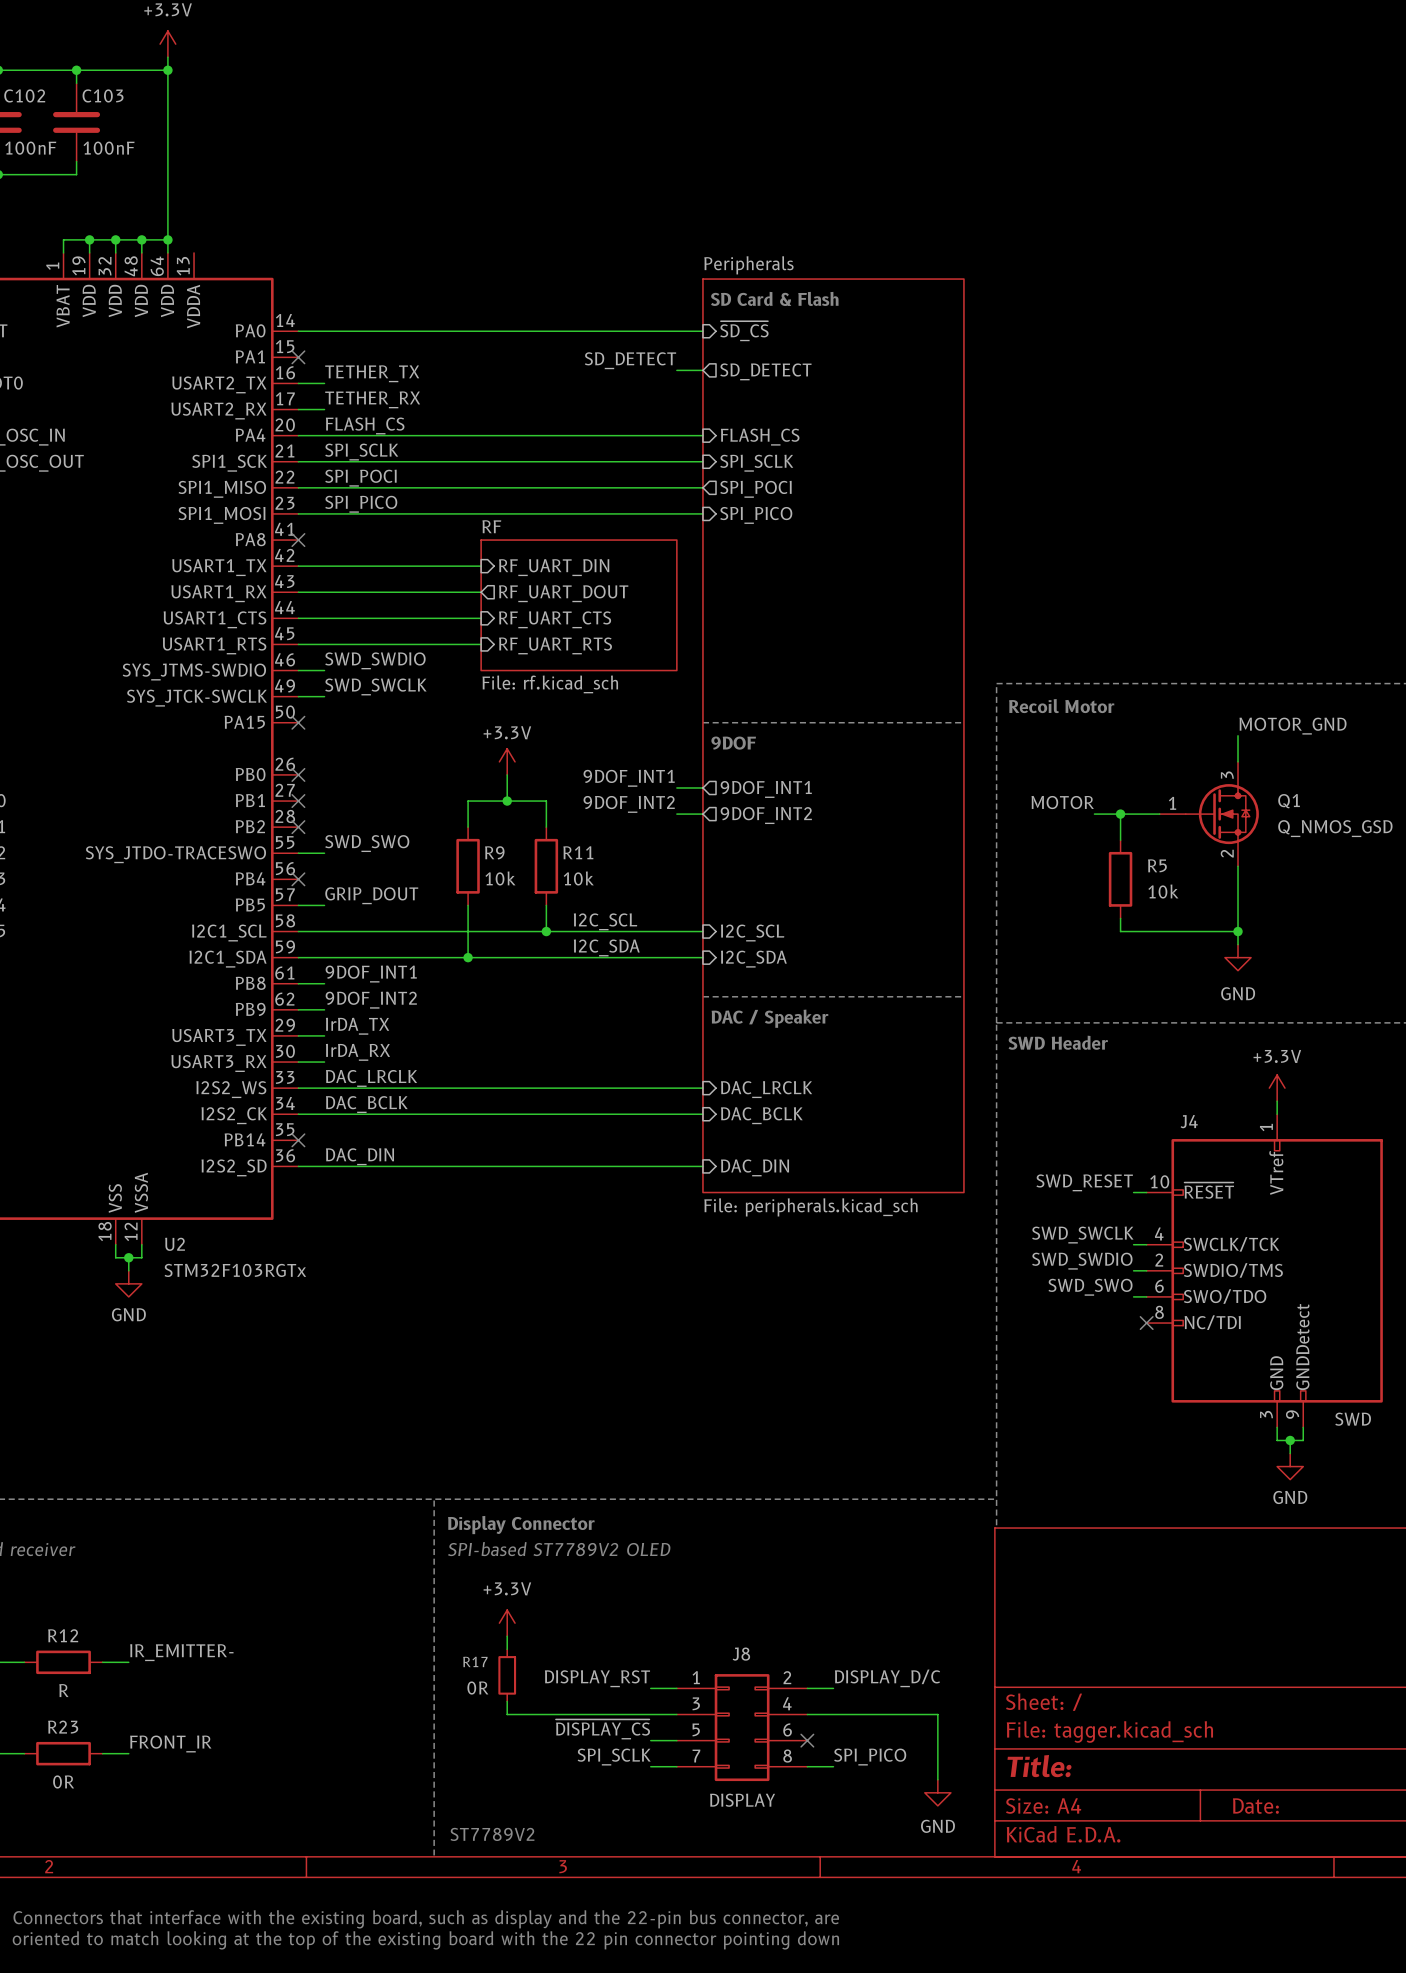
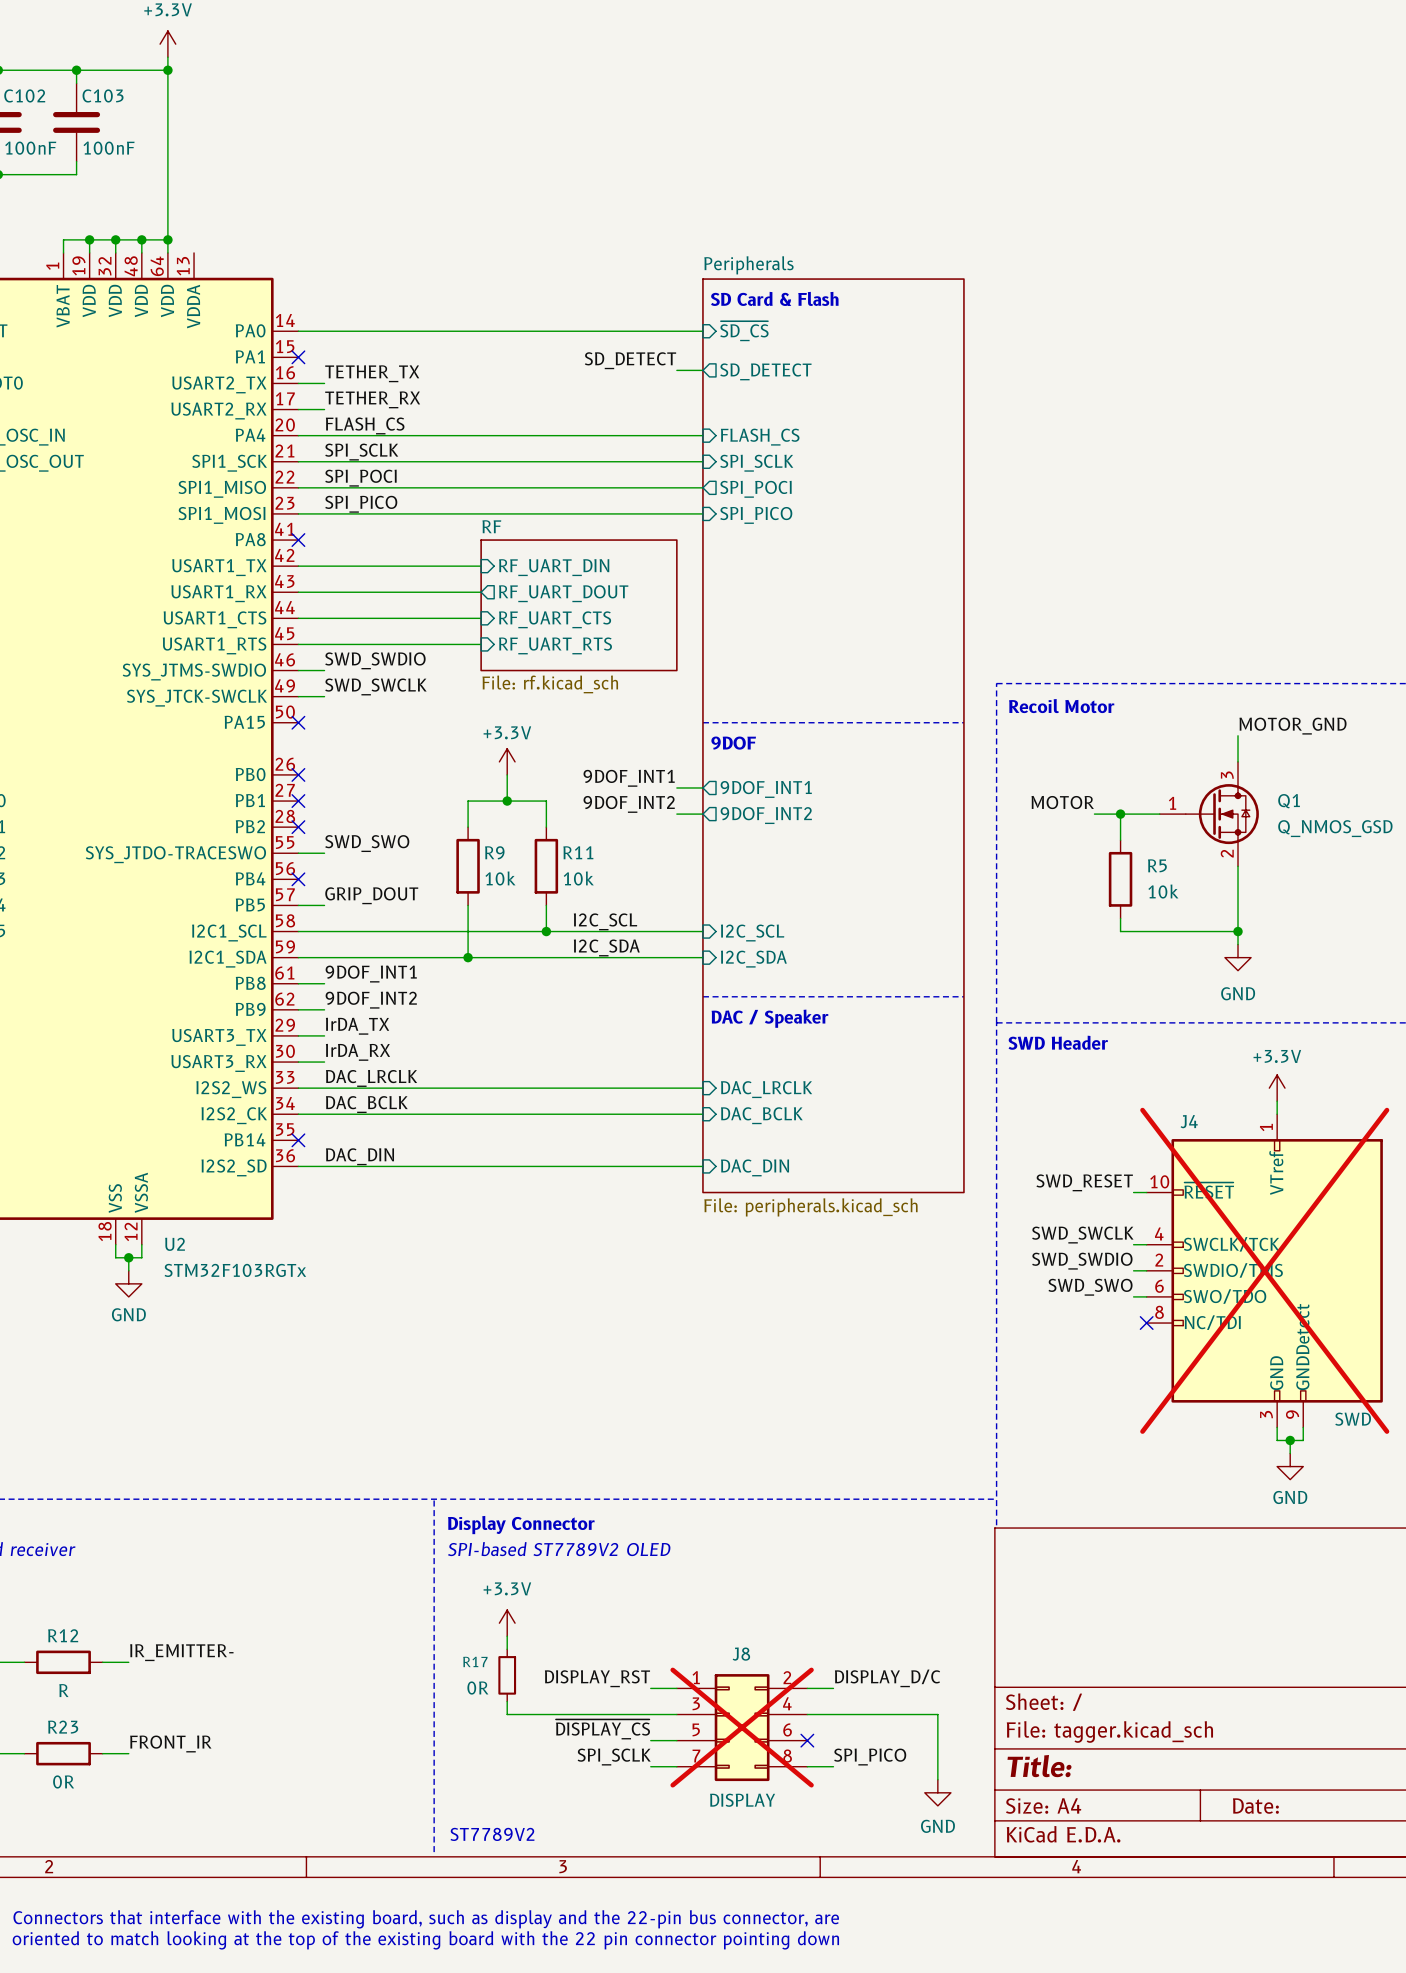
J4 do-not-place cross: none -> (1264, 1270)
J8 do-not-place cross: none -> (742, 1727)

